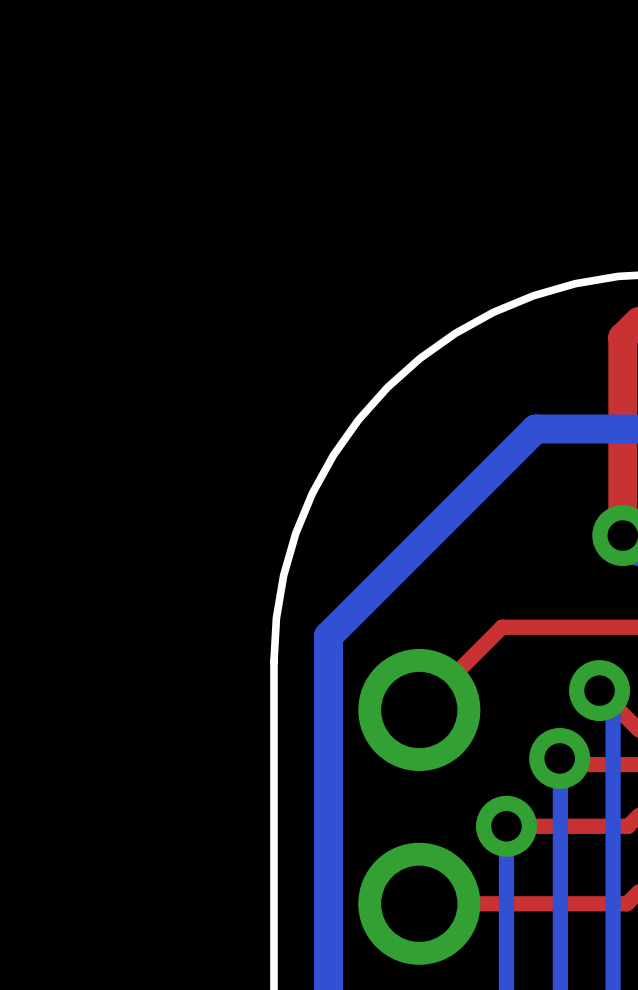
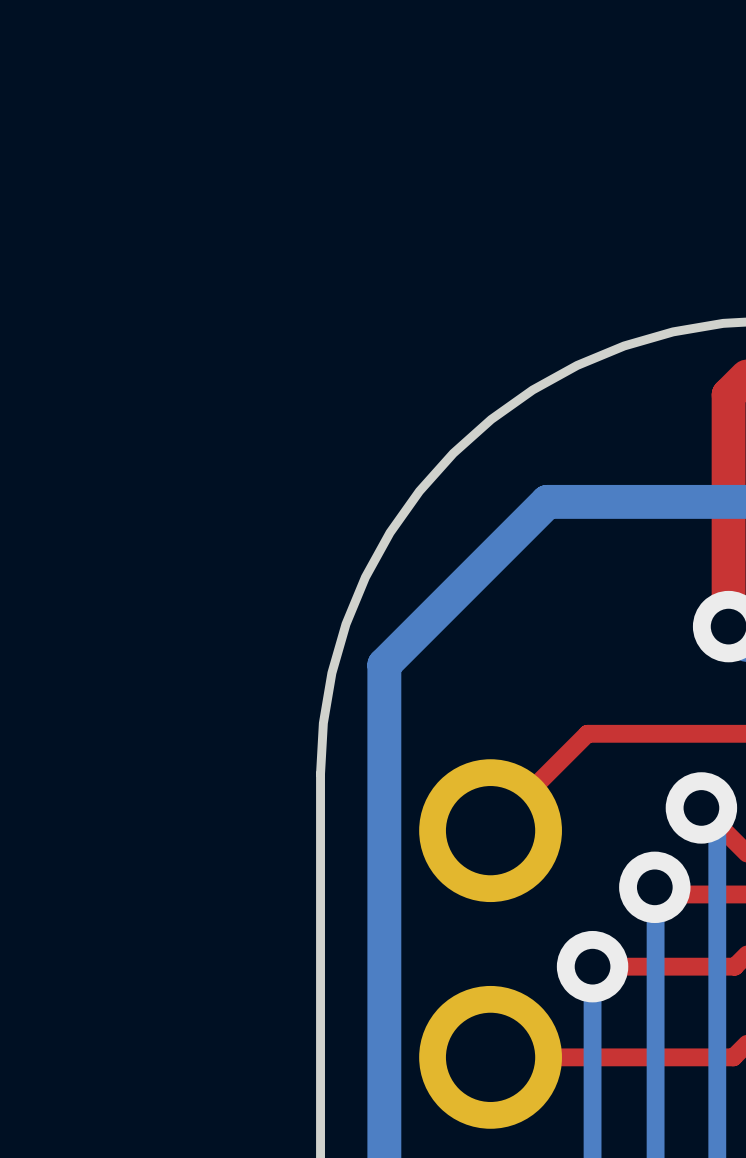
bottom track: (535, 429) (328, 636) -> (626, 501) (547, 501) (384, 664) (384, 744)

